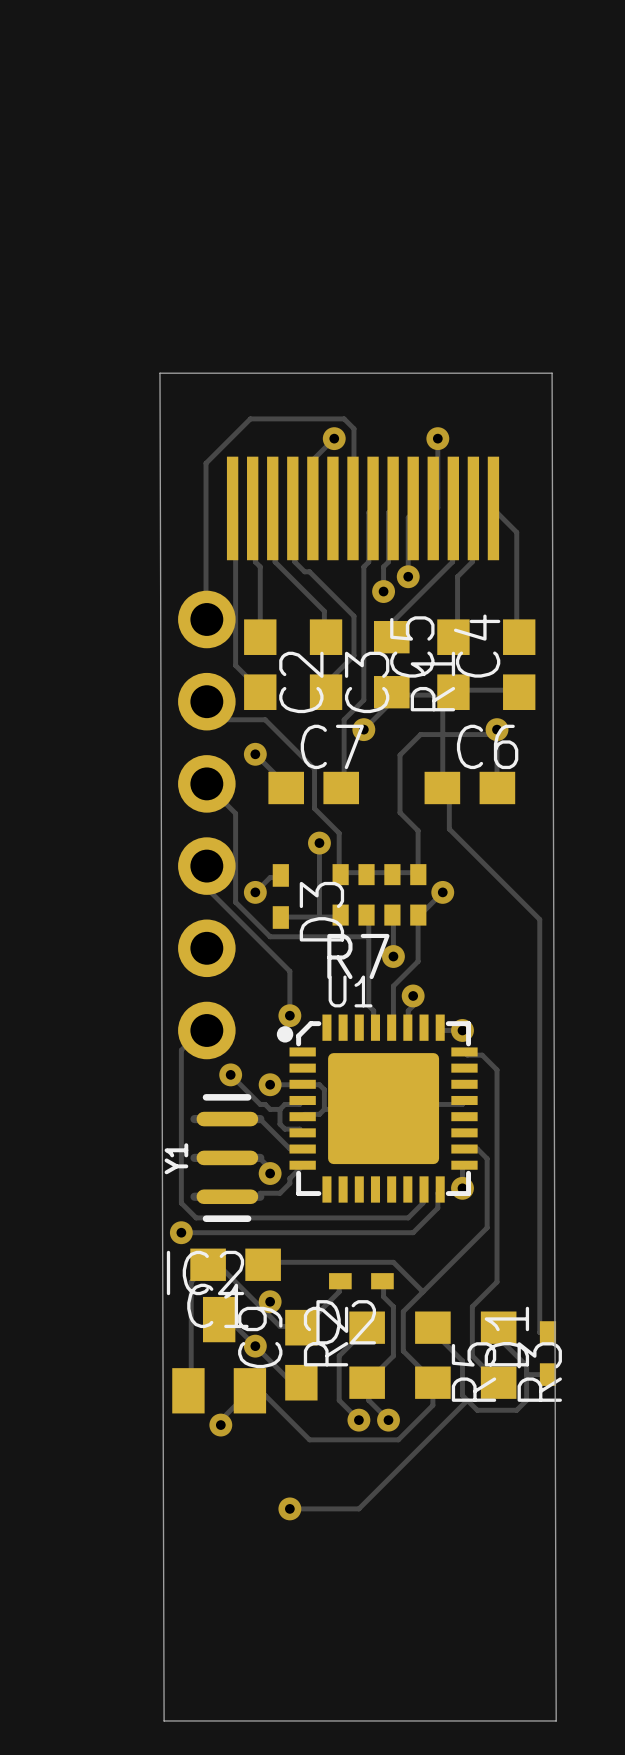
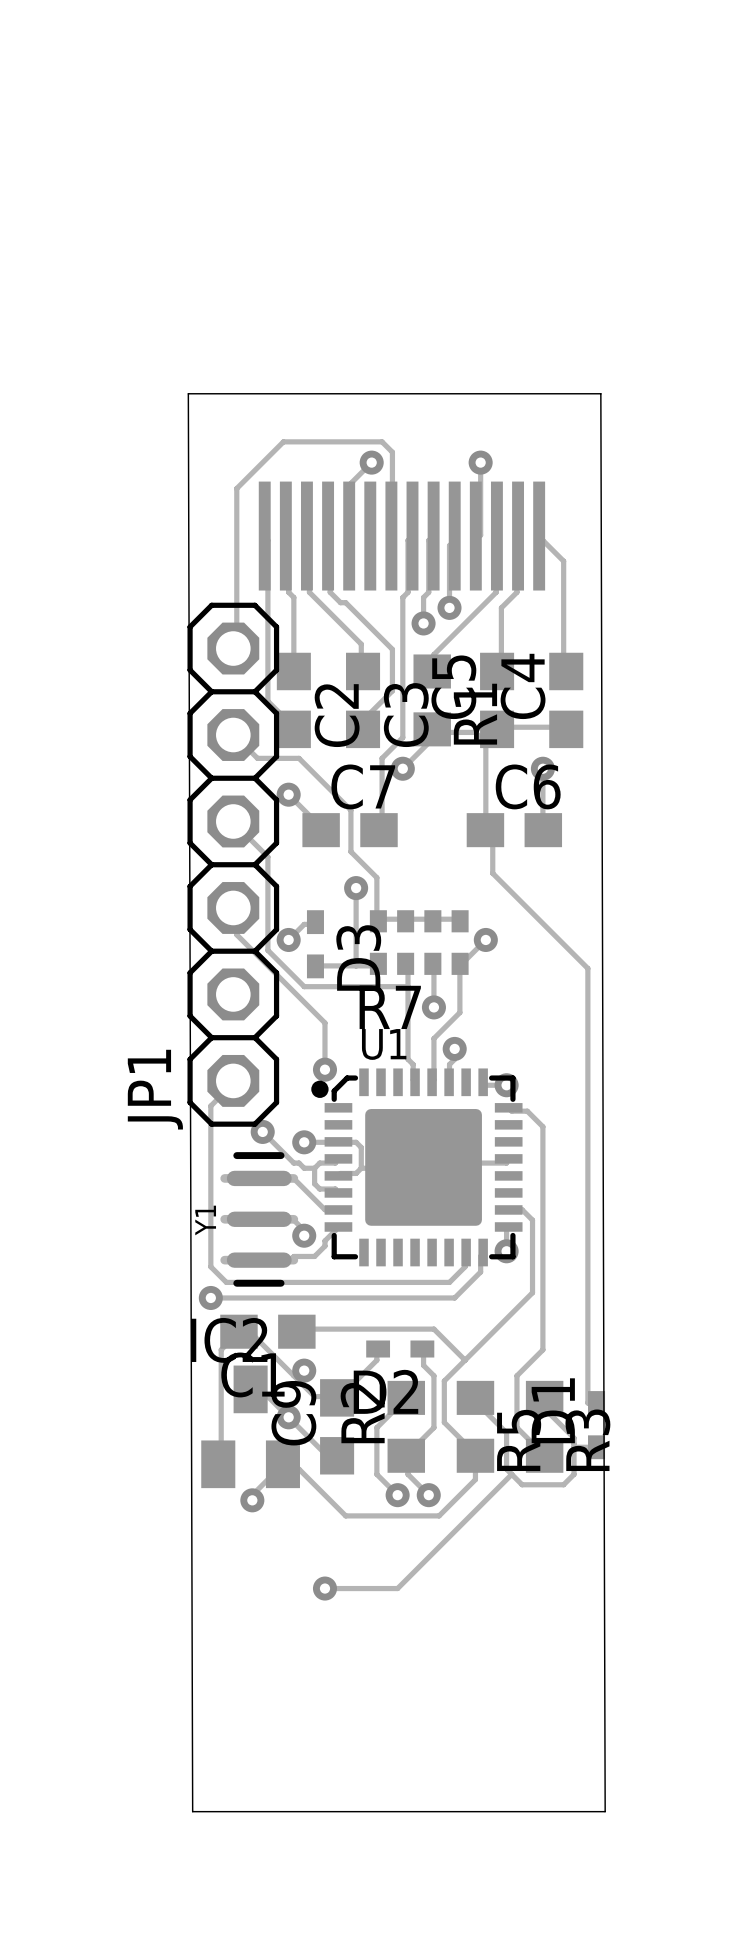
track: (497, 729) (492, 734) (420, 734) (400, 755) (400, 812) (418, 830) (418, 872) -> none
JP1: none -> (233, 864)
part: (206, 824) -> none

